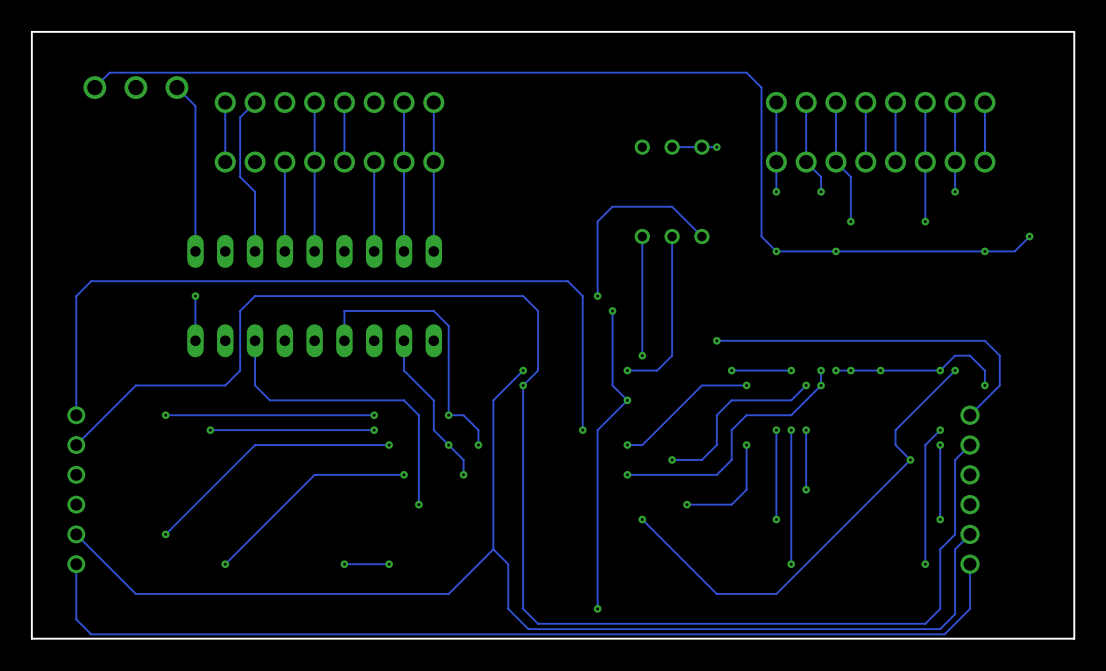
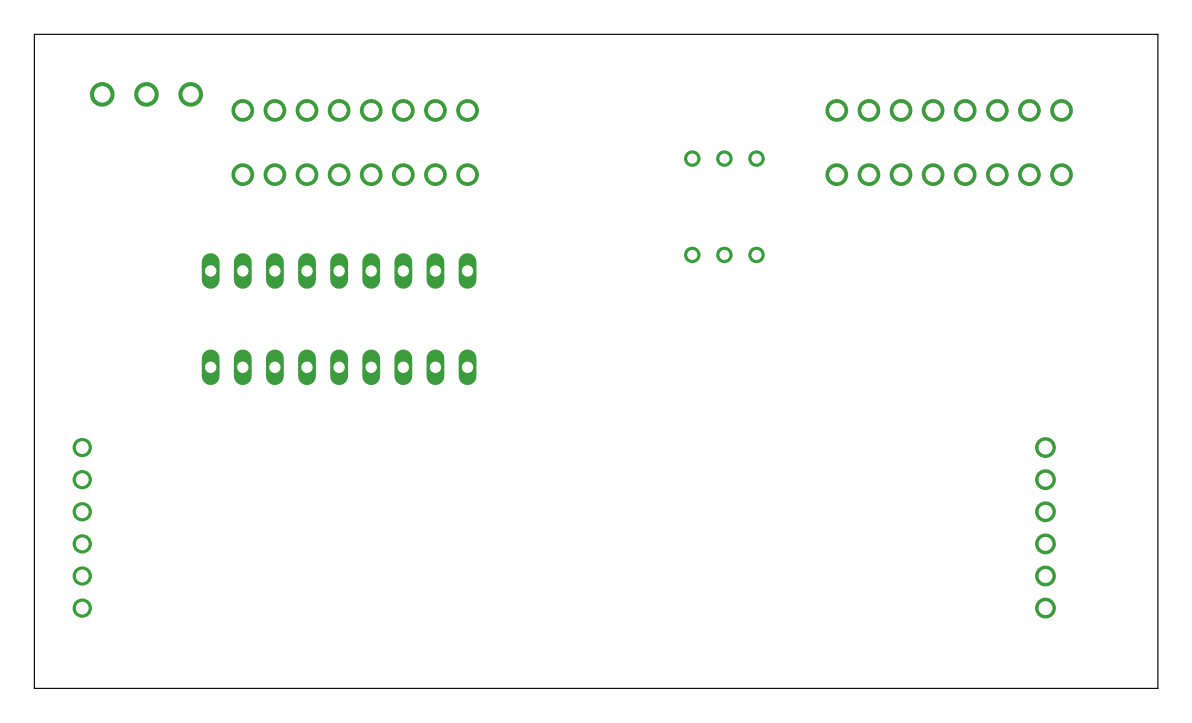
track: (94, 87) (109, 72) (746, 72) (761, 87) (761, 236) (776, 251) (1014, 251) (1029, 236) -> none
track: (176, 87) (195, 106) (195, 251) -> none
track: (225, 102) (225, 162) -> none
track: (255, 102) (240, 117) (240, 176) (255, 191) (255, 251) -> none
track: (314, 102) (314, 251) -> none
track: (344, 102) (344, 162) -> none
track: (404, 102) (404, 251) -> none
track: (433, 102) (433, 251) -> none
track: (776, 102) (776, 191) -> none
track: (806, 102) (806, 162) (821, 176) (821, 191) -> none
track: (835, 102) (835, 162) (850, 176) (850, 221) -> none
track: (865, 102) (865, 162) -> none
track: (895, 102) (895, 162) -> none
track: (925, 102) (925, 221) -> none
track: (955, 102) (955, 191) -> none
track: (984, 102) (984, 162) -> none
track: (716, 147) (672, 147) -> none
via: (716, 147) -> none
track: (284, 162) (284, 251) -> none
track: (374, 162) (374, 251) -> none
via: (776, 191) -> none
via: (821, 191) -> none
via: (955, 191) -> none
via: (850, 221) -> none
via: (925, 221) -> none
track: (642, 236) (642, 355) -> none
track: (672, 236) (672, 355) (657, 370) (627, 370) -> none
track: (701, 236) (672, 206) (612, 206) (597, 221) (597, 296) -> none
via: (1029, 236) -> none
via: (776, 251) -> none
via: (835, 251) -> none
via: (984, 251) -> none
track: (195, 296) (195, 340) -> none
via: (195, 296) -> none
via: (597, 296) -> none
track: (612, 310) (612, 385) (627, 400) (597, 430) (597, 608) -> none
via: (612, 310) -> none
track: (255, 340) (255, 385) (269, 400) (404, 400) (418, 415) (418, 504) -> none
track: (344, 340) (344, 310) (433, 310) (448, 325) (448, 415) (463, 415) (478, 430) (478, 445) -> none
track: (404, 340) (404, 370) (433, 400) (433, 430) (463, 459) (463, 474) -> none
track: (716, 340) (984, 340) (999, 355) (999, 385) (970, 415) -> none
via: (716, 340) -> none
via: (642, 355) -> none
track: (523, 370) (493, 400) (493, 549) -> none
via: (523, 370) -> none
via: (627, 370) -> none
via: (731, 370) -> none
track: (791, 370) (731, 370) -> none
via: (791, 370) -> none
track: (821, 370) (821, 385) (791, 415) (746, 415) (731, 430) (731, 459) (716, 474) (627, 474) -> none
via: (821, 370) -> none
track: (835, 370) (940, 370) (955, 355) (970, 355) (984, 370) (984, 385) -> none
via: (835, 370) -> none
via: (850, 370) -> none
via: (880, 370) -> none
via: (940, 370) -> none
track: (955, 370) (895, 430) (895, 445) (910, 459) (776, 594) (716, 594) (642, 519) -> none
via: (955, 370) -> none
via: (523, 385) -> none
track: (746, 385) (701, 385) (642, 445) (627, 445) -> none
via: (746, 385) -> none
track: (806, 385) (791, 400) (731, 400) (716, 415) (716, 445) (701, 459) (672, 459) -> none
via: (806, 385) -> none
via: (821, 385) -> none
via: (984, 385) -> none
via: (627, 400) -> none
track: (76, 415) (76, 296) (91, 281) (567, 281) (582, 296) (582, 430) -> none
via: (165, 415) -> none
track: (374, 415) (165, 415) -> none
via: (374, 415) -> none
via: (448, 415) -> none
via: (210, 430) -> none
track: (374, 430) (210, 430) -> none
via: (374, 430) -> none
via: (582, 430) -> none
track: (776, 430) (776, 519) -> none
via: (776, 430) -> none
track: (791, 430) (791, 564) -> none
via: (791, 430) -> none
track: (806, 430) (806, 489) -> none
via: (806, 430) -> none
track: (940, 430) (925, 445) (925, 564) -> none
via: (940, 430) -> none
track: (389, 445) (255, 445) (165, 534) -> none
via: (389, 445) -> none
via: (448, 445) -> none
via: (478, 445) -> none
via: (627, 445) -> none
track: (746, 445) (746, 489) (731, 504) (687, 504) -> none
via: (746, 445) -> none
track: (940, 445) (940, 519) -> none
via: (940, 445) -> none
track: (970, 445) (955, 459) (955, 534) (940, 549) (940, 608) (925, 623) (538, 623) (523, 608) (523, 385) (538, 370) (538, 310) (523, 296) (255, 296) (240, 310) (240, 370) (225, 385) (135, 385) (76, 445) -> none
via: (672, 459) -> none
via: (910, 459) -> none
track: (404, 474) (314, 474) (225, 564) -> none
via: (404, 474) -> none
via: (463, 474) -> none
via: (627, 474) -> none
via: (806, 489) -> none
via: (418, 504) -> none
via: (687, 504) -> none
via: (642, 519) -> none
via: (776, 519) -> none
via: (940, 519) -> none
track: (76, 534) (135, 594) (448, 594) (493, 549) -> none
via: (165, 534) -> none
track: (970, 534) (955, 549) (955, 614) (940, 629) (528, 629) (508, 608) (508, 564) (493, 549) -> none
via: (225, 564) -> none
via: (344, 564) -> none
track: (389, 564) (344, 564) -> none
via: (389, 564) -> none
via: (791, 564) -> none
via: (925, 564) -> none
track: (970, 564) (970, 608) (944, 634) (91, 634) (76, 619) (76, 564) -> none
via: (597, 608) -> none

